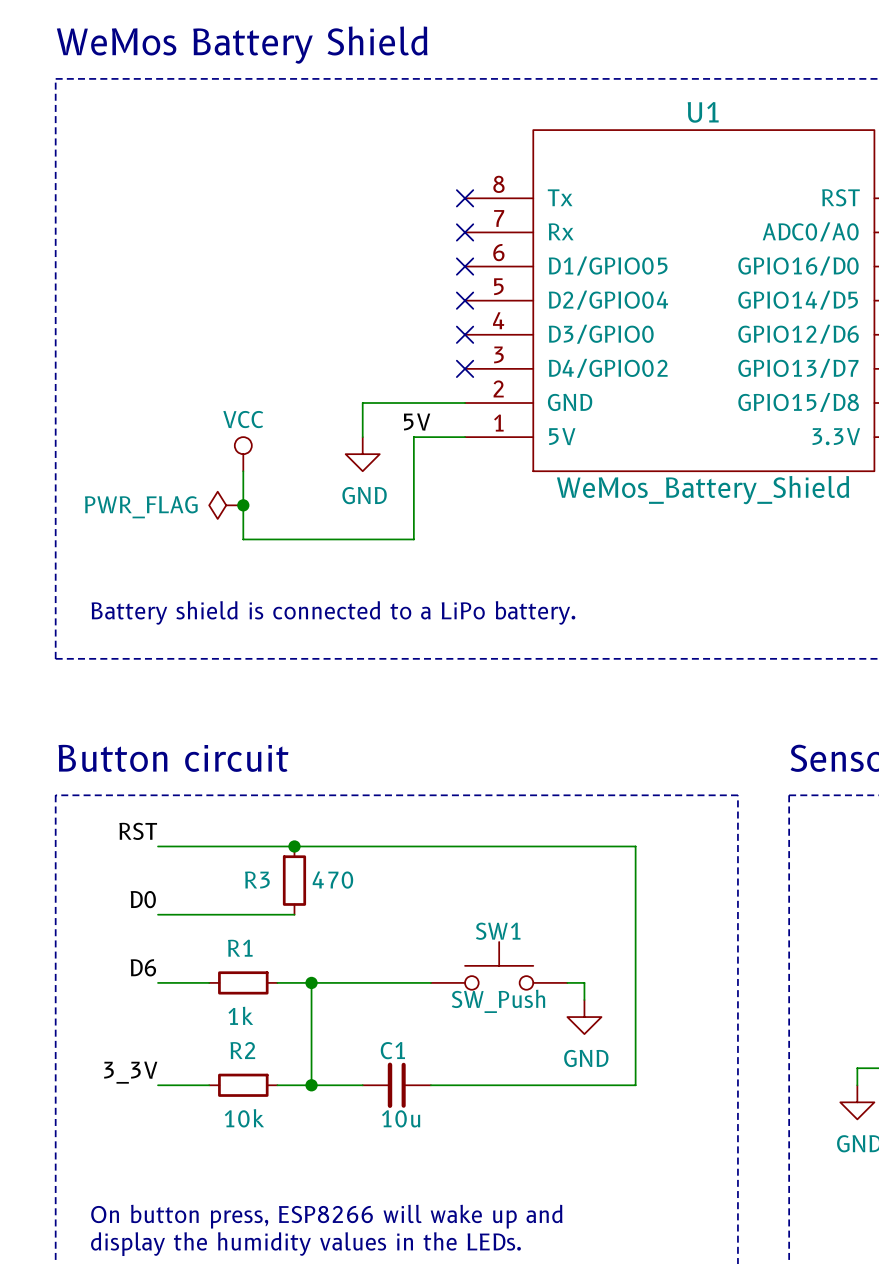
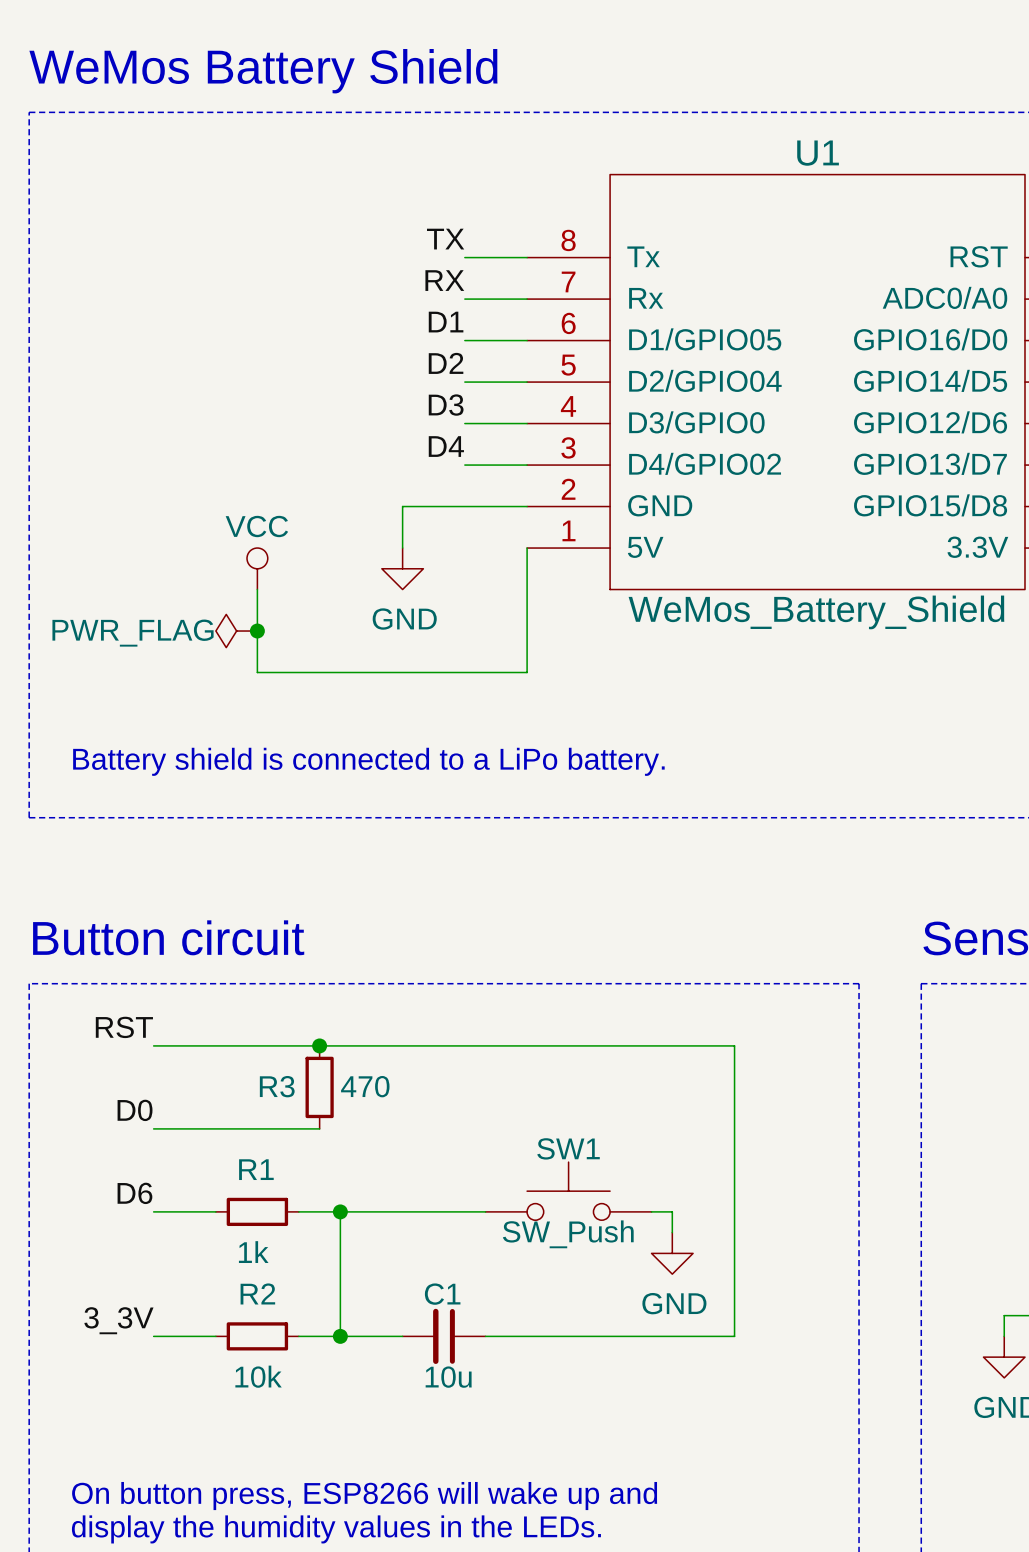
label: none -> TX (445, 239)
wire: none -> (464, 257) (527, 257)
no-connect mark: (465, 198) -> none
label: none -> RX (444, 280)
wire: none -> (464, 299) (527, 299)
no-connect mark: (465, 232) -> none
label: none -> D1 (446, 322)
wire: none -> (464, 340) (527, 340)
no-connect mark: (465, 266) -> none
label: none -> D2 (446, 363)
wire: none -> (464, 382) (527, 382)
no-connect mark: (465, 300) -> none
label: none -> D3 (446, 405)
wire: none -> (464, 423) (527, 423)
no-connect mark: (465, 334) -> none
label: none -> D4 (446, 446)
wire: none -> (464, 465) (527, 465)
no-connect mark: (465, 368) -> none
label: 5V (417, 422) -> none
wire: (465, 437) (413, 437) (413, 539) -> (527, 548) (527, 672) (464, 672)

